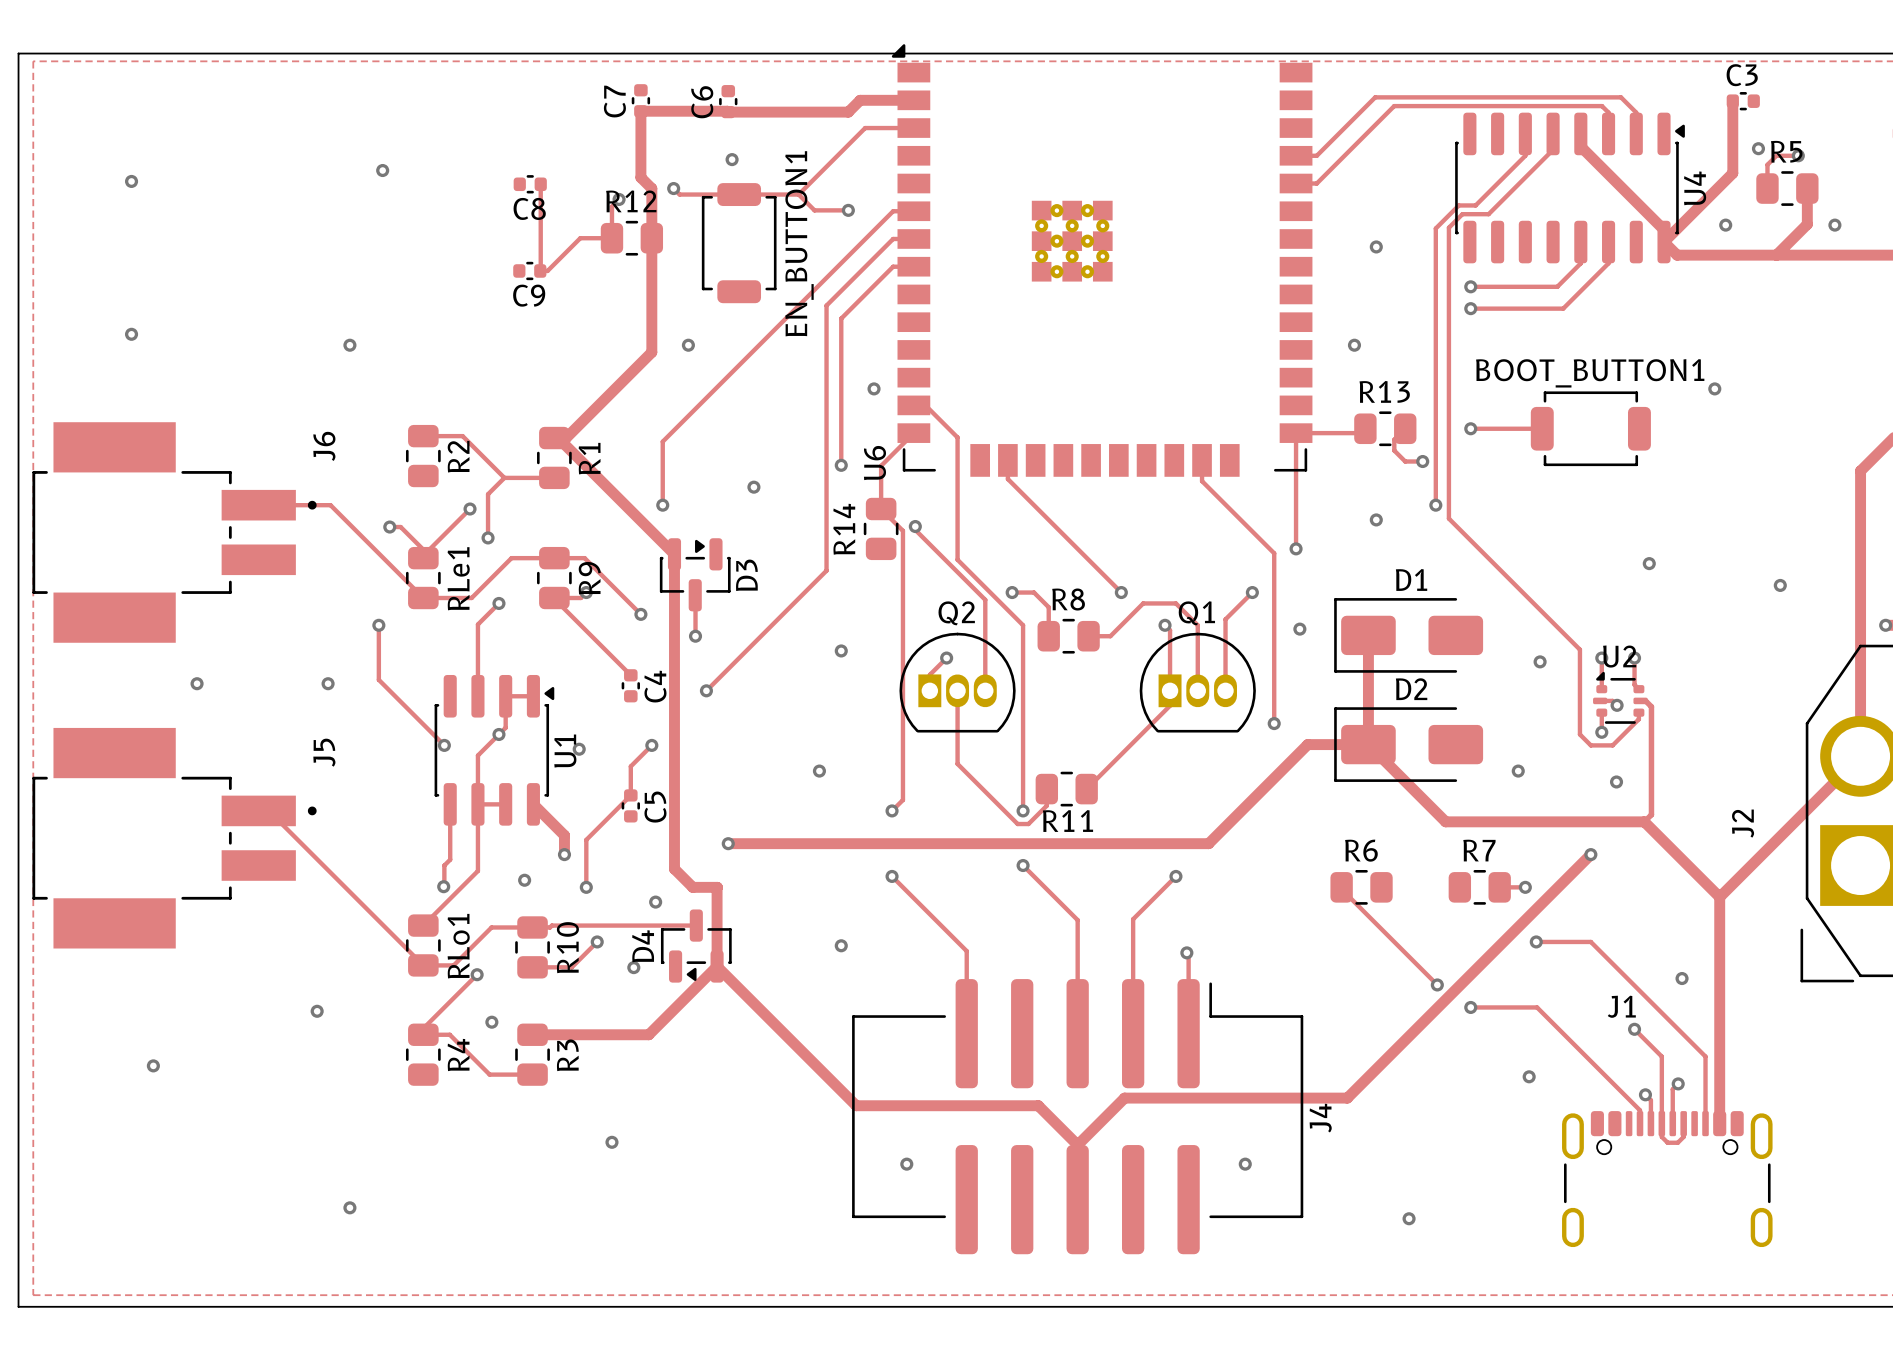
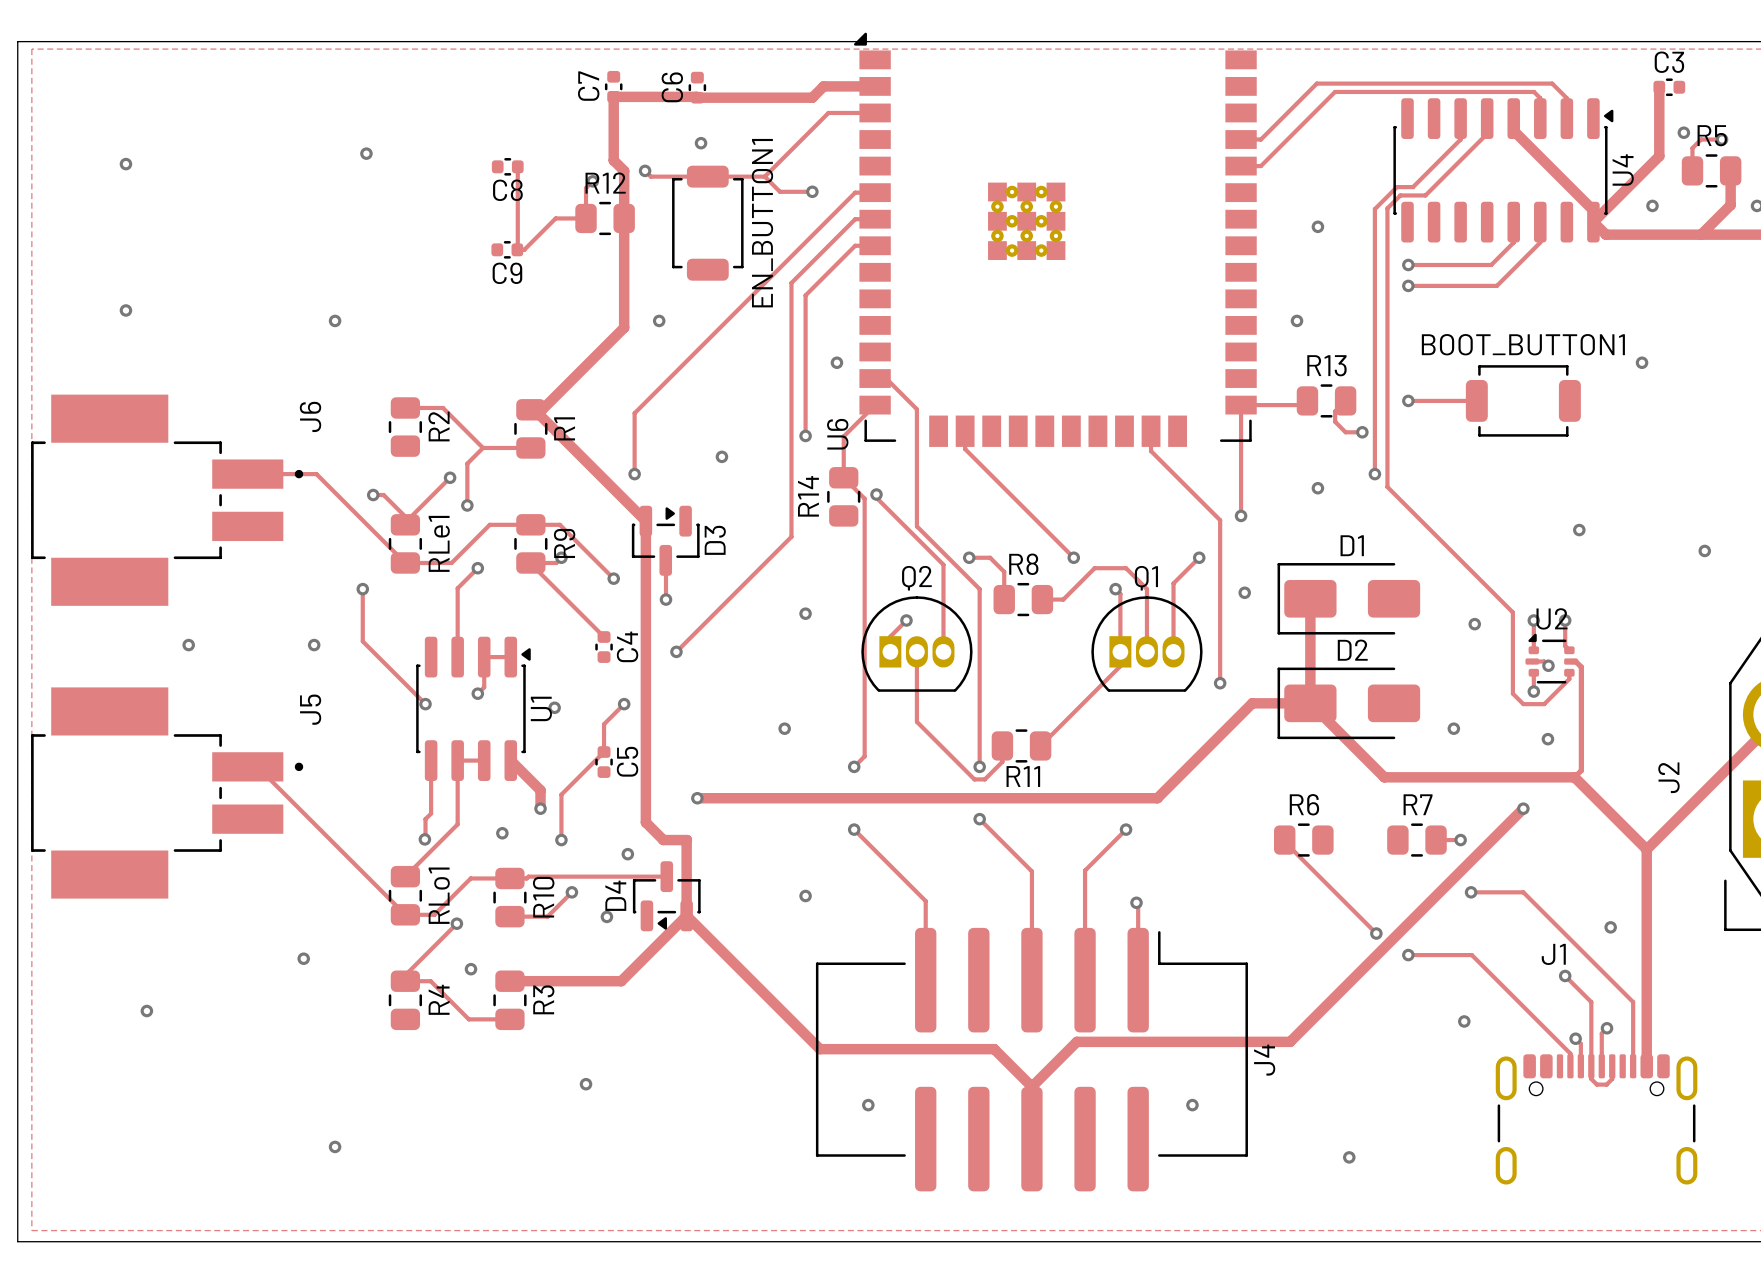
track: (498, 734) (477, 755) (477, 804) -> none

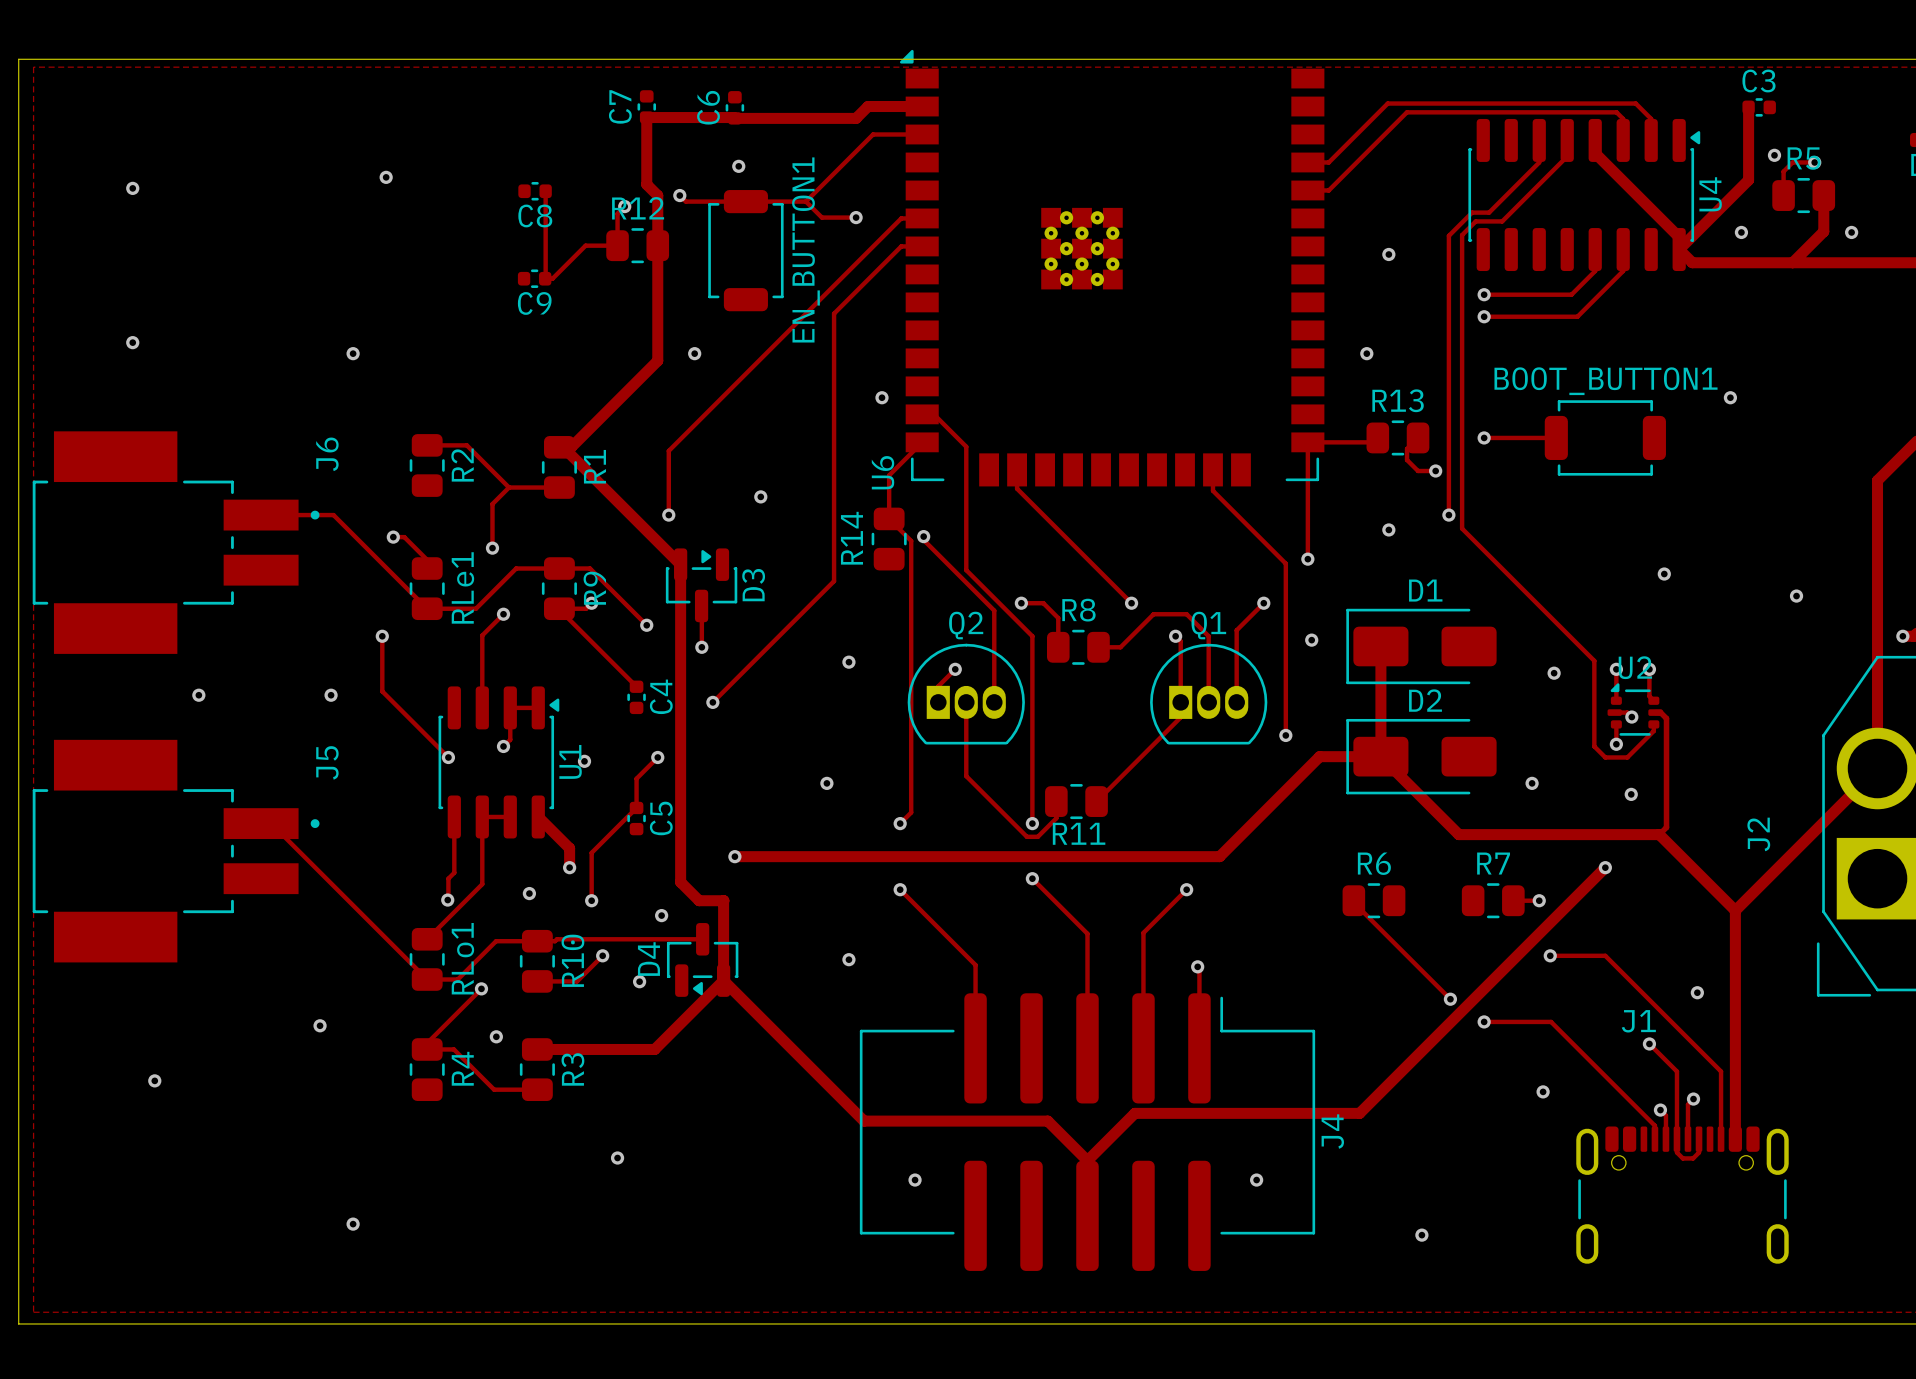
track: (875, 245) (855, 245) (805, 295) (805, 435) -> none
via: (805, 435) -> none
track: (450, 477) (405, 522) -> none
via: (450, 477) -> none

